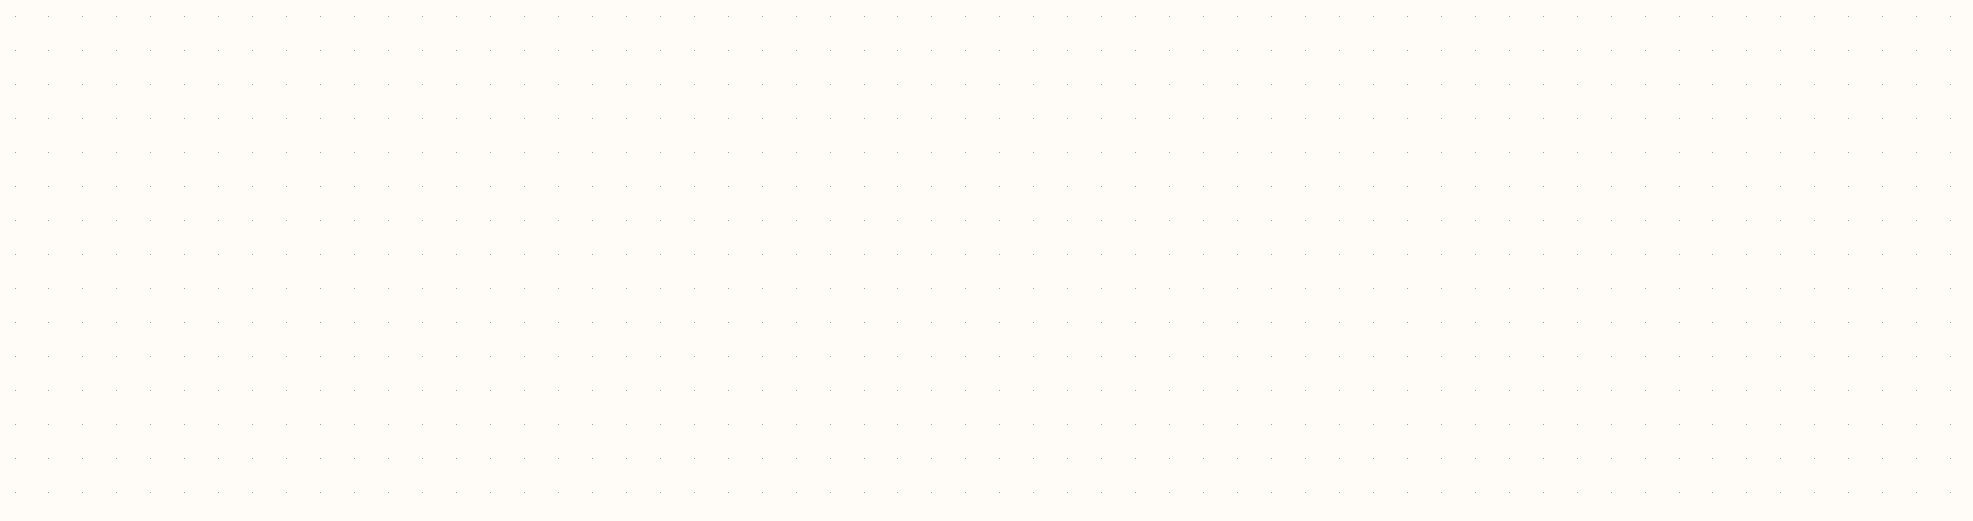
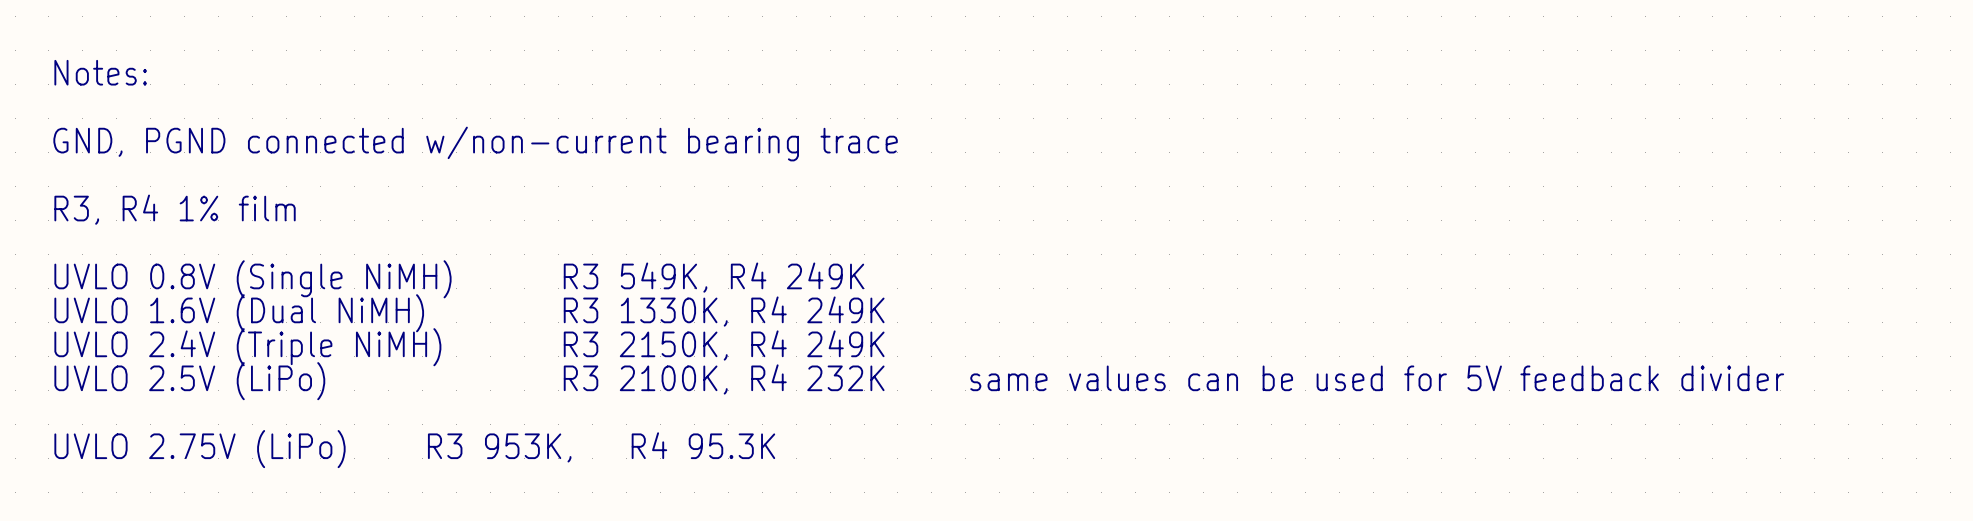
text: none -> Notes: (100, 72)
text: none -> GND, PGND connected w/non-current bearing trace (475, 144)
text: none -> R3, R4 1% film (175, 209)
text: none -> R3 549K, R4 249K (713, 277)
text: none -> UVLO 0.8V (Single NiMH) (252, 279)
text: none -> R3 1330K, R4 249K (724, 311)
text: none -> UVLO 1.6V (Dual NiMH) (239, 313)
text: none -> R3 2150K, R4 249K (724, 345)
text: none -> UVLO 2.4V (Triple NiMH) (247, 347)
text: none -> same values can be used for 5V feedback divider (1377, 378)
text: none -> R3 2100K, R4 232K (724, 379)
text: none -> UVLO 2.5V (LiPo) (189, 381)
text: none -> R4 95.3K (703, 445)
text: none -> R3 953K, (499, 447)
text: none -> UVLO 2.75V (LiPo) (200, 449)

